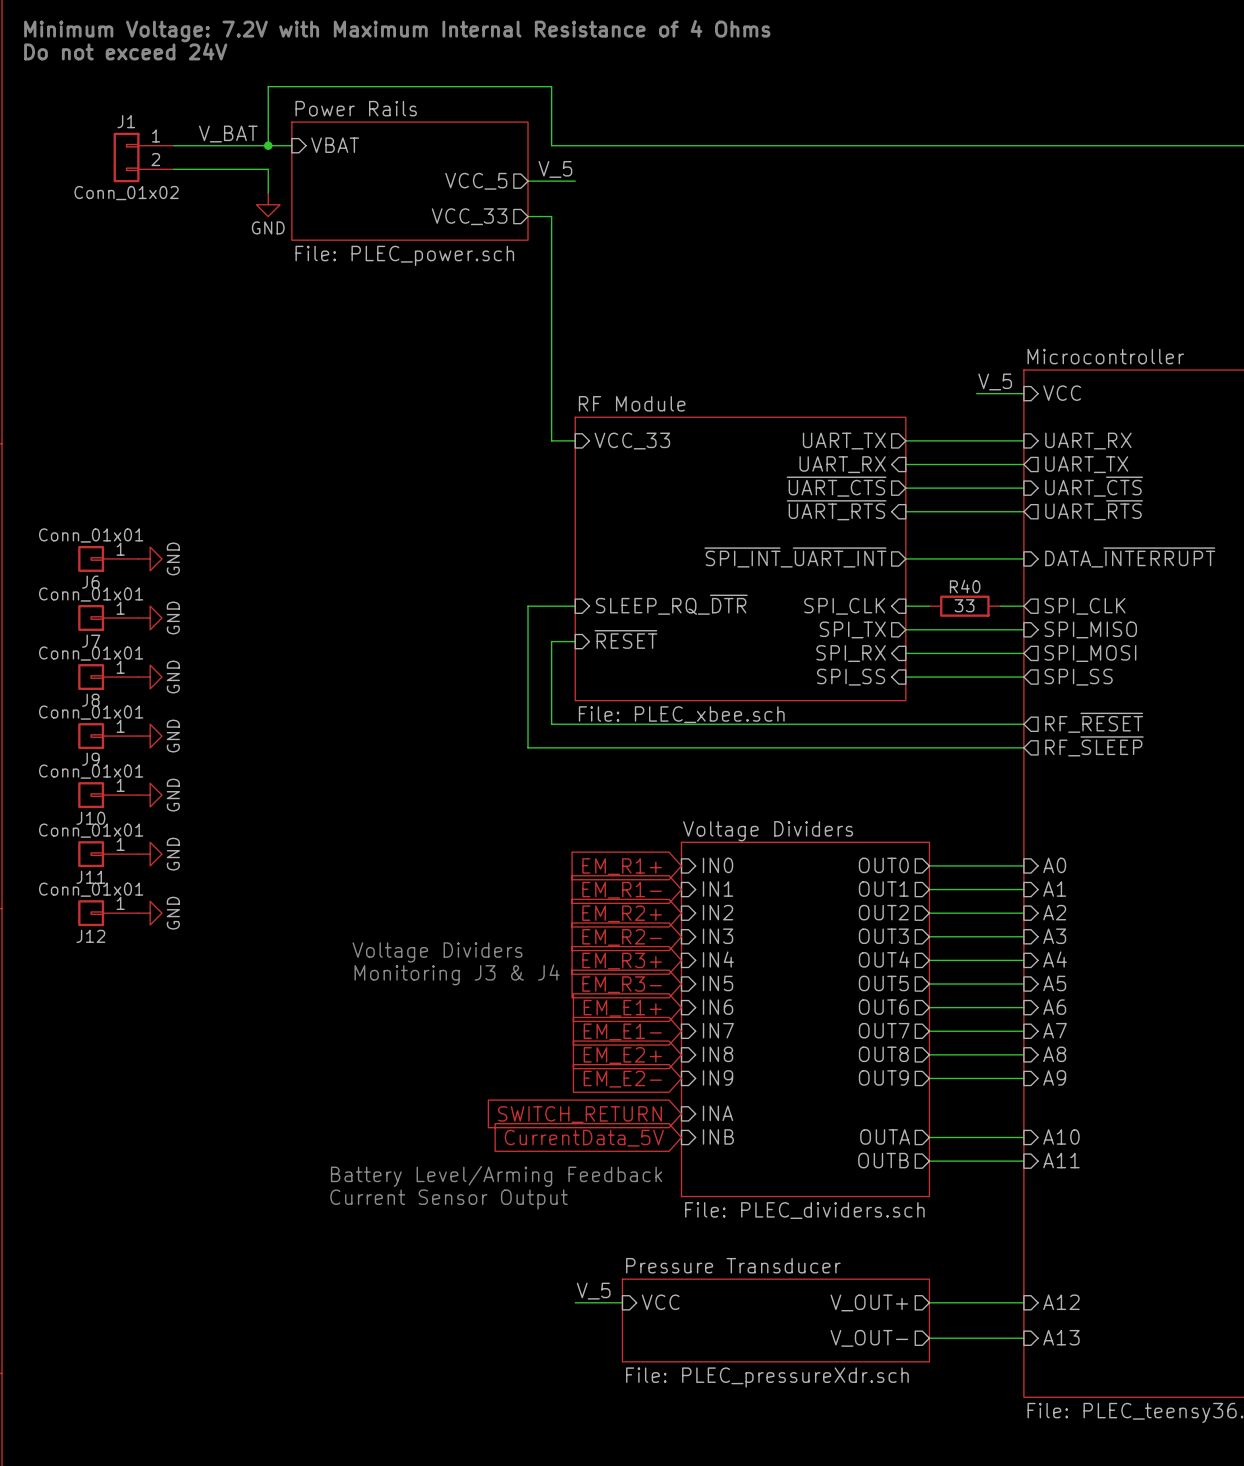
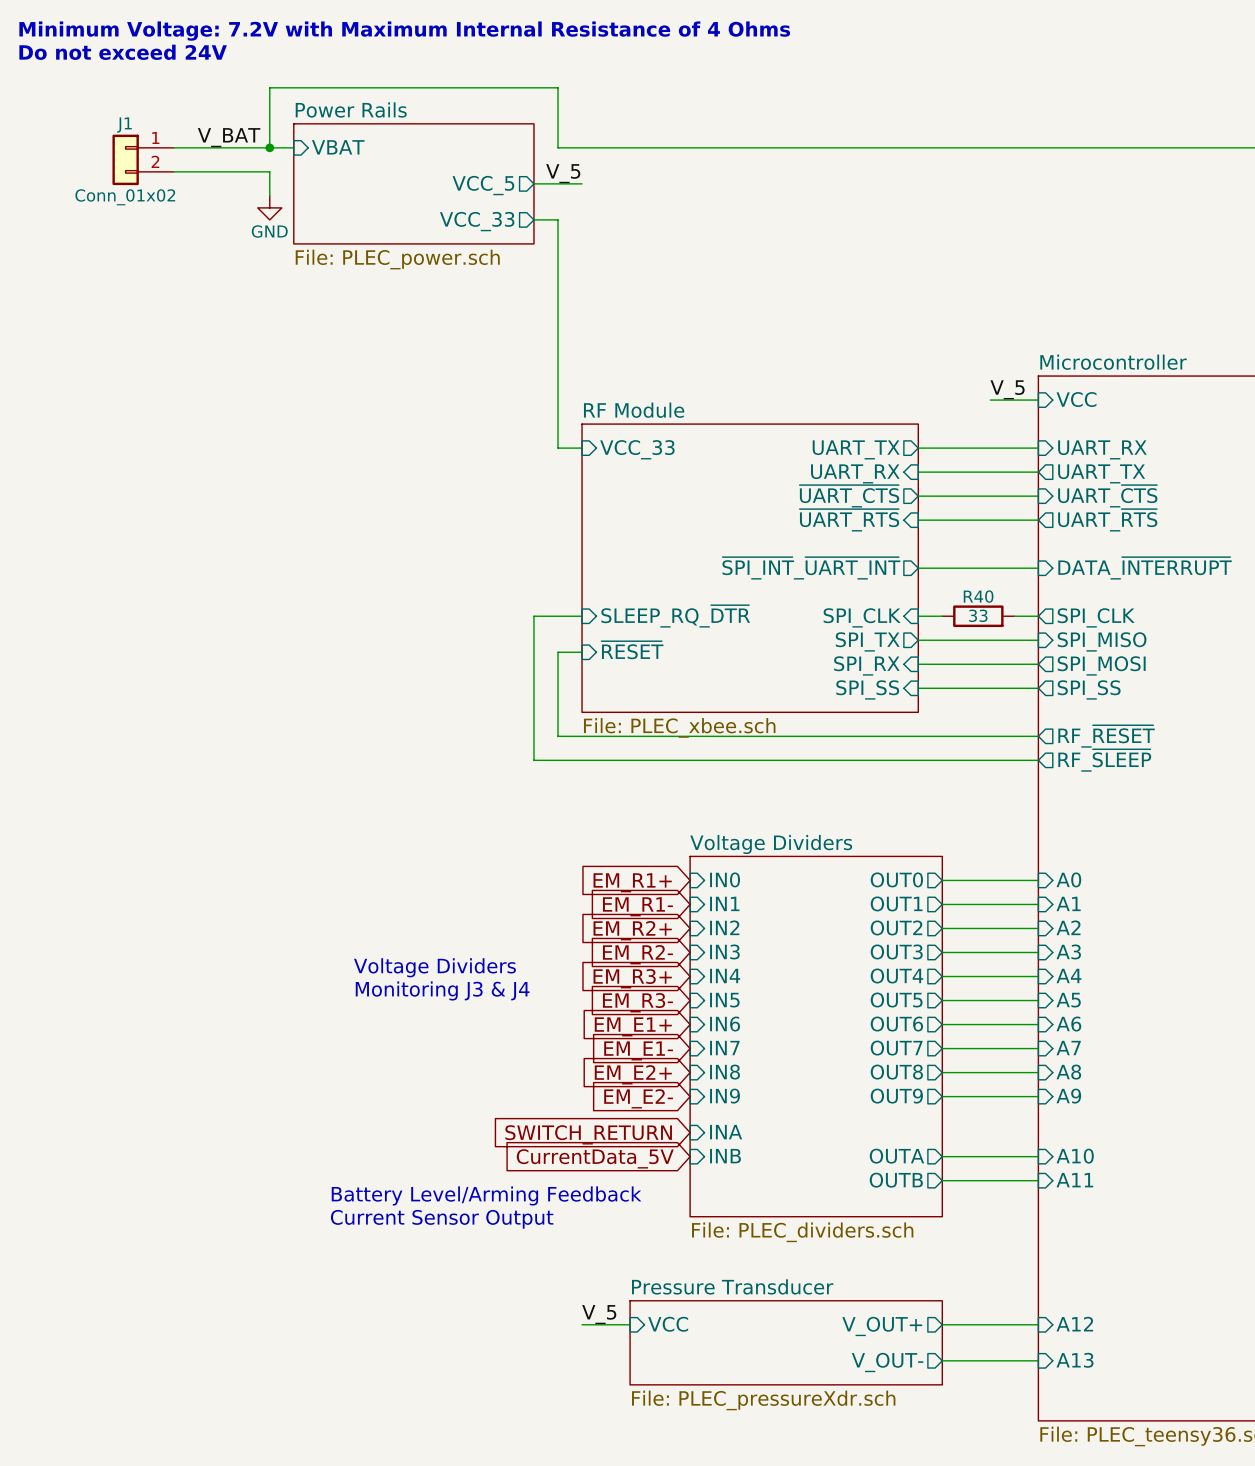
J6: Conn_01x01 (108, 558) -> none
power symbol: GND (150, 558) -> none
J7: Conn_01x01 (108, 617) -> none
power symbol: GND (150, 617) -> none
J8: Conn_01x01 (108, 677) -> none
power symbol: GND (150, 677) -> none
J9: Conn_01x01 (108, 736) -> none
power symbol: GND (150, 736) -> none
J10: Conn_01x01 (108, 795) -> none
power symbol: GND (150, 795) -> none
J11: Conn_01x01 (108, 854) -> none
power symbol: GND (150, 854) -> none
J12: Conn_01x01 (108, 913) -> none
power symbol: GND (150, 913) -> none

